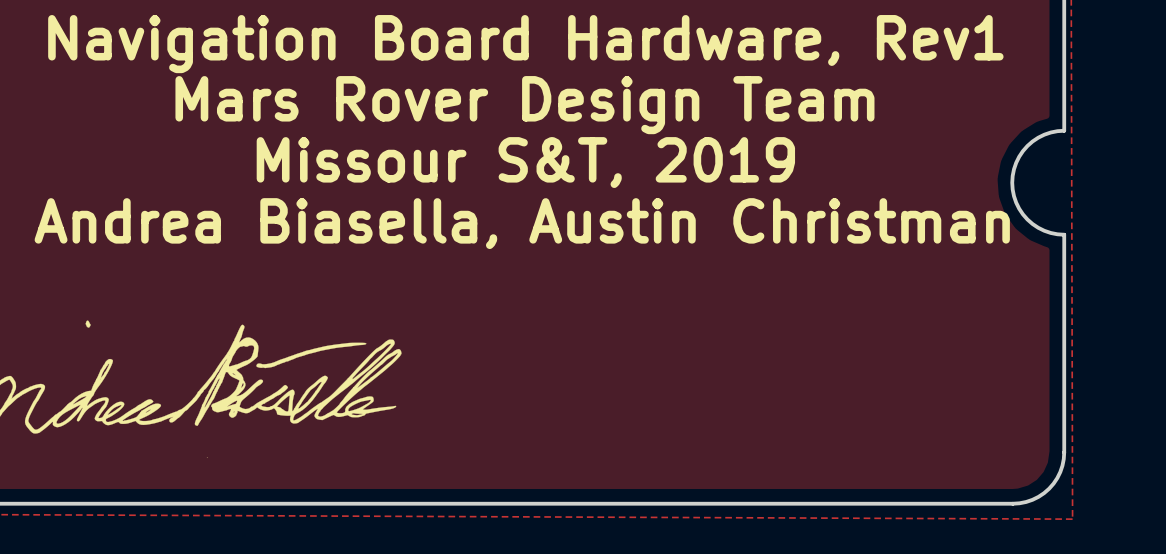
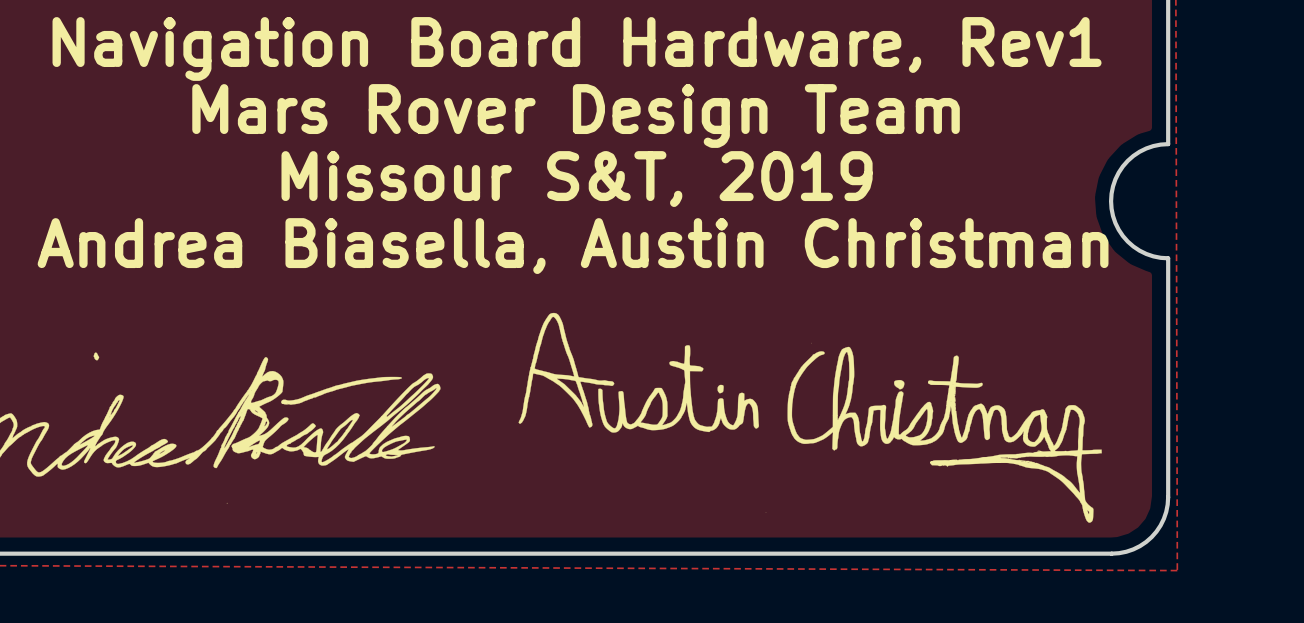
drawing: none -> [518, 312, 1102, 523]

